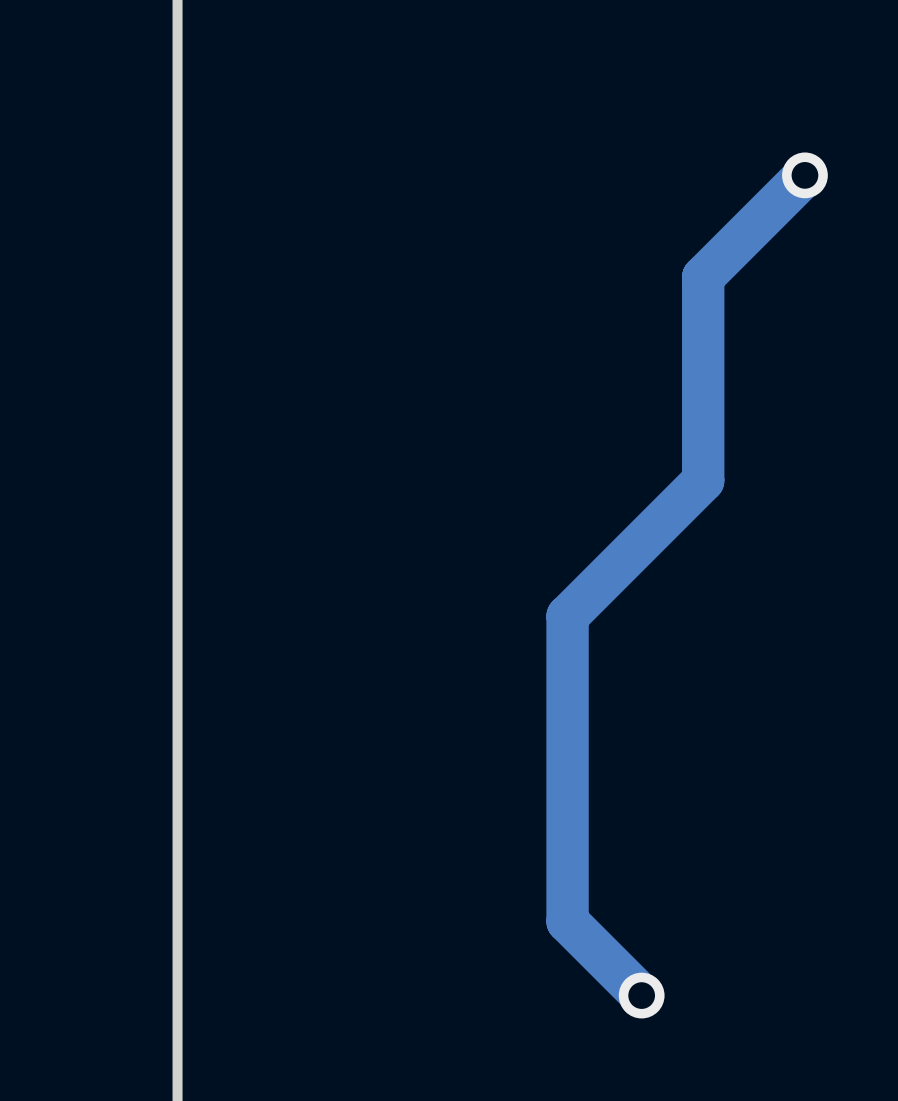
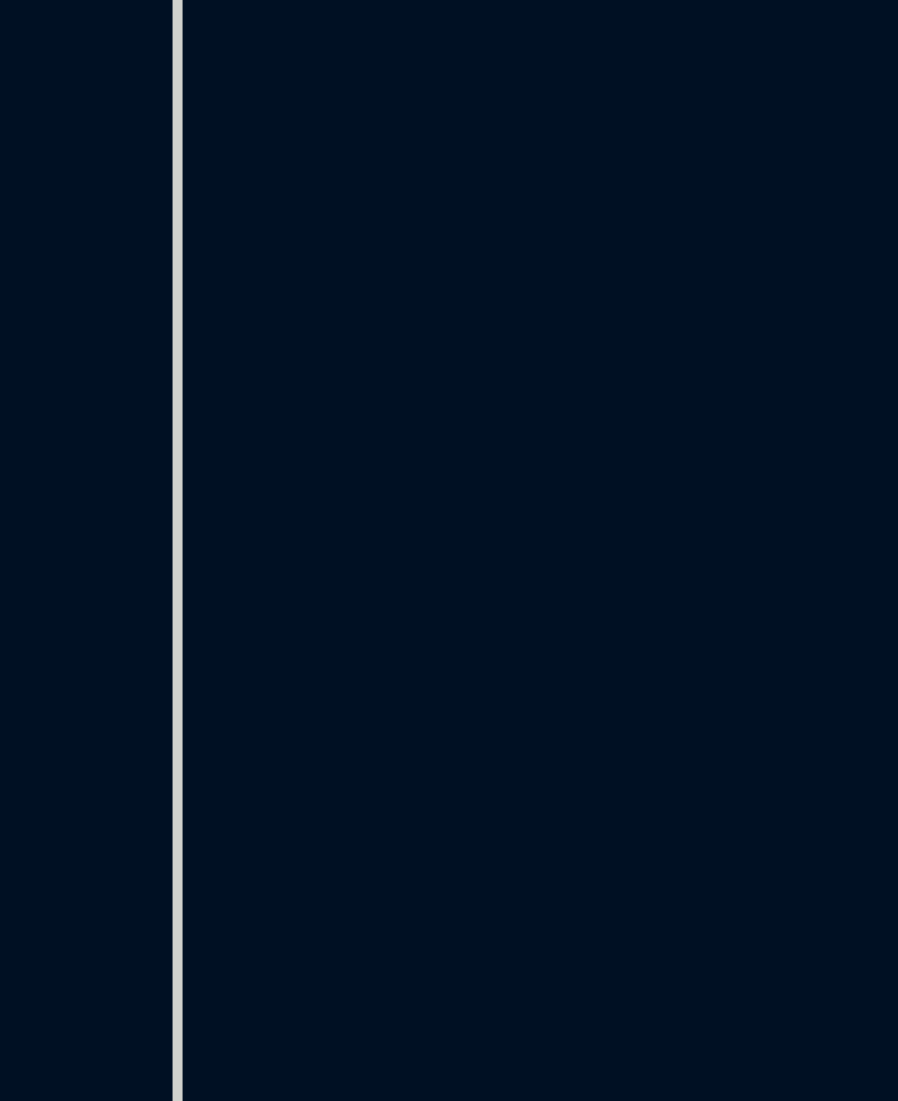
track: (804, 175) (703, 277) (703, 480) (567, 616) (567, 921) (641, 995) -> none
via: (804, 175) -> none
via: (641, 995) -> none

